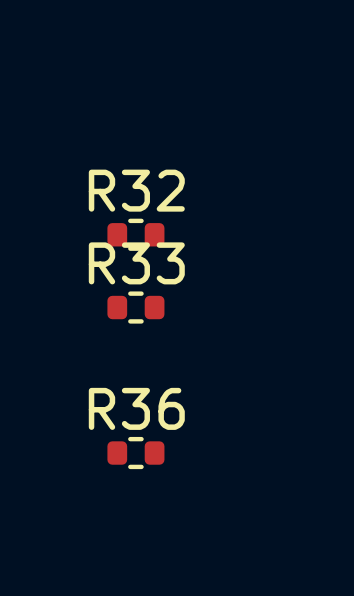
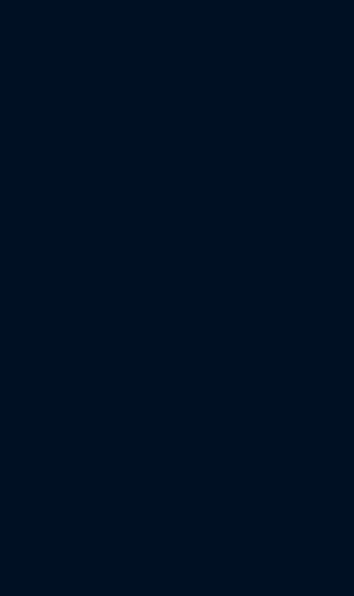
R32: (135, 234) -> none
R33: (135, 307) -> none
R36: (135, 453) -> none

